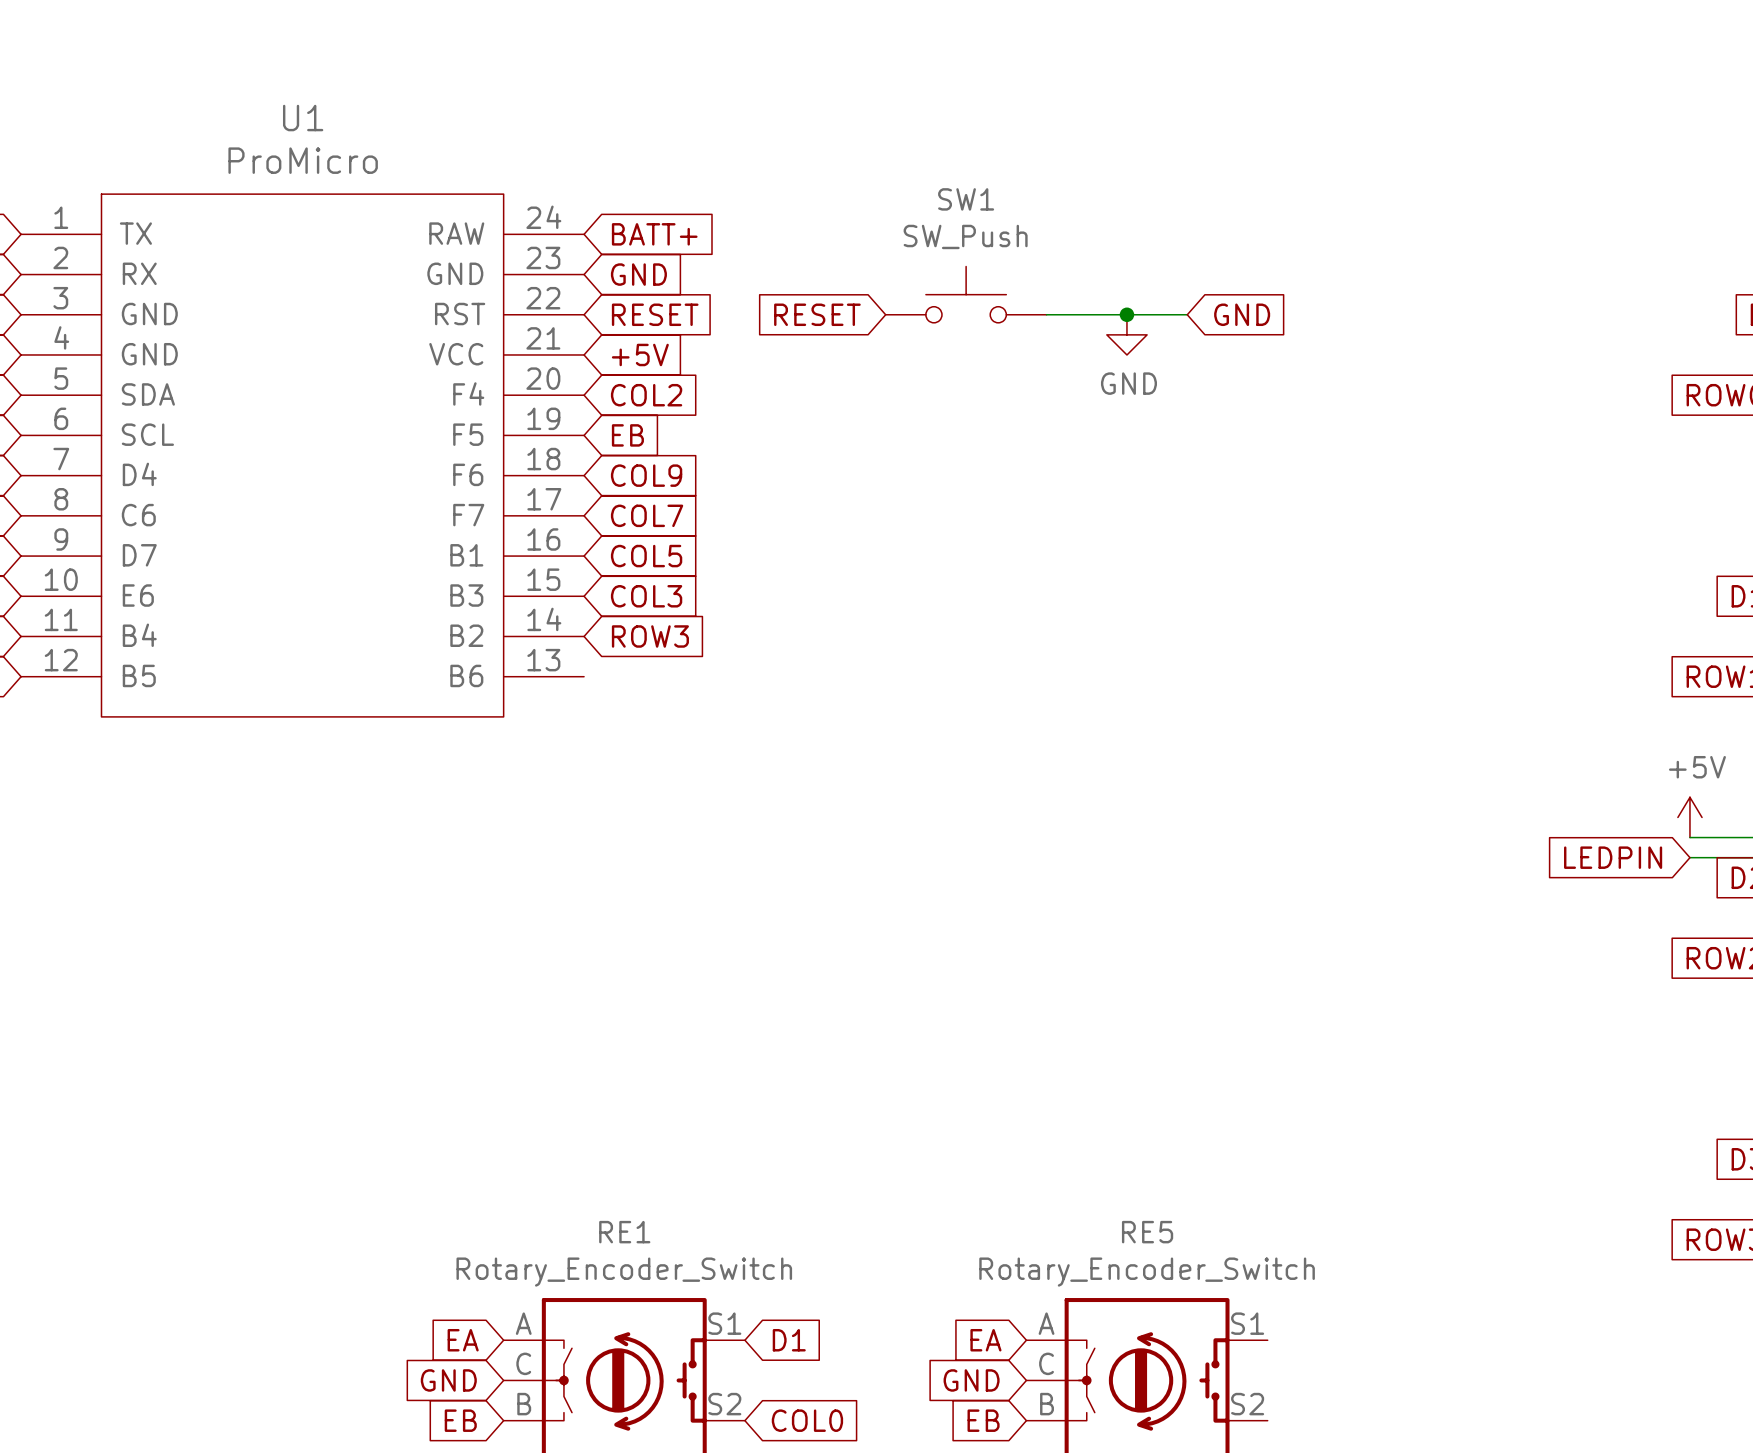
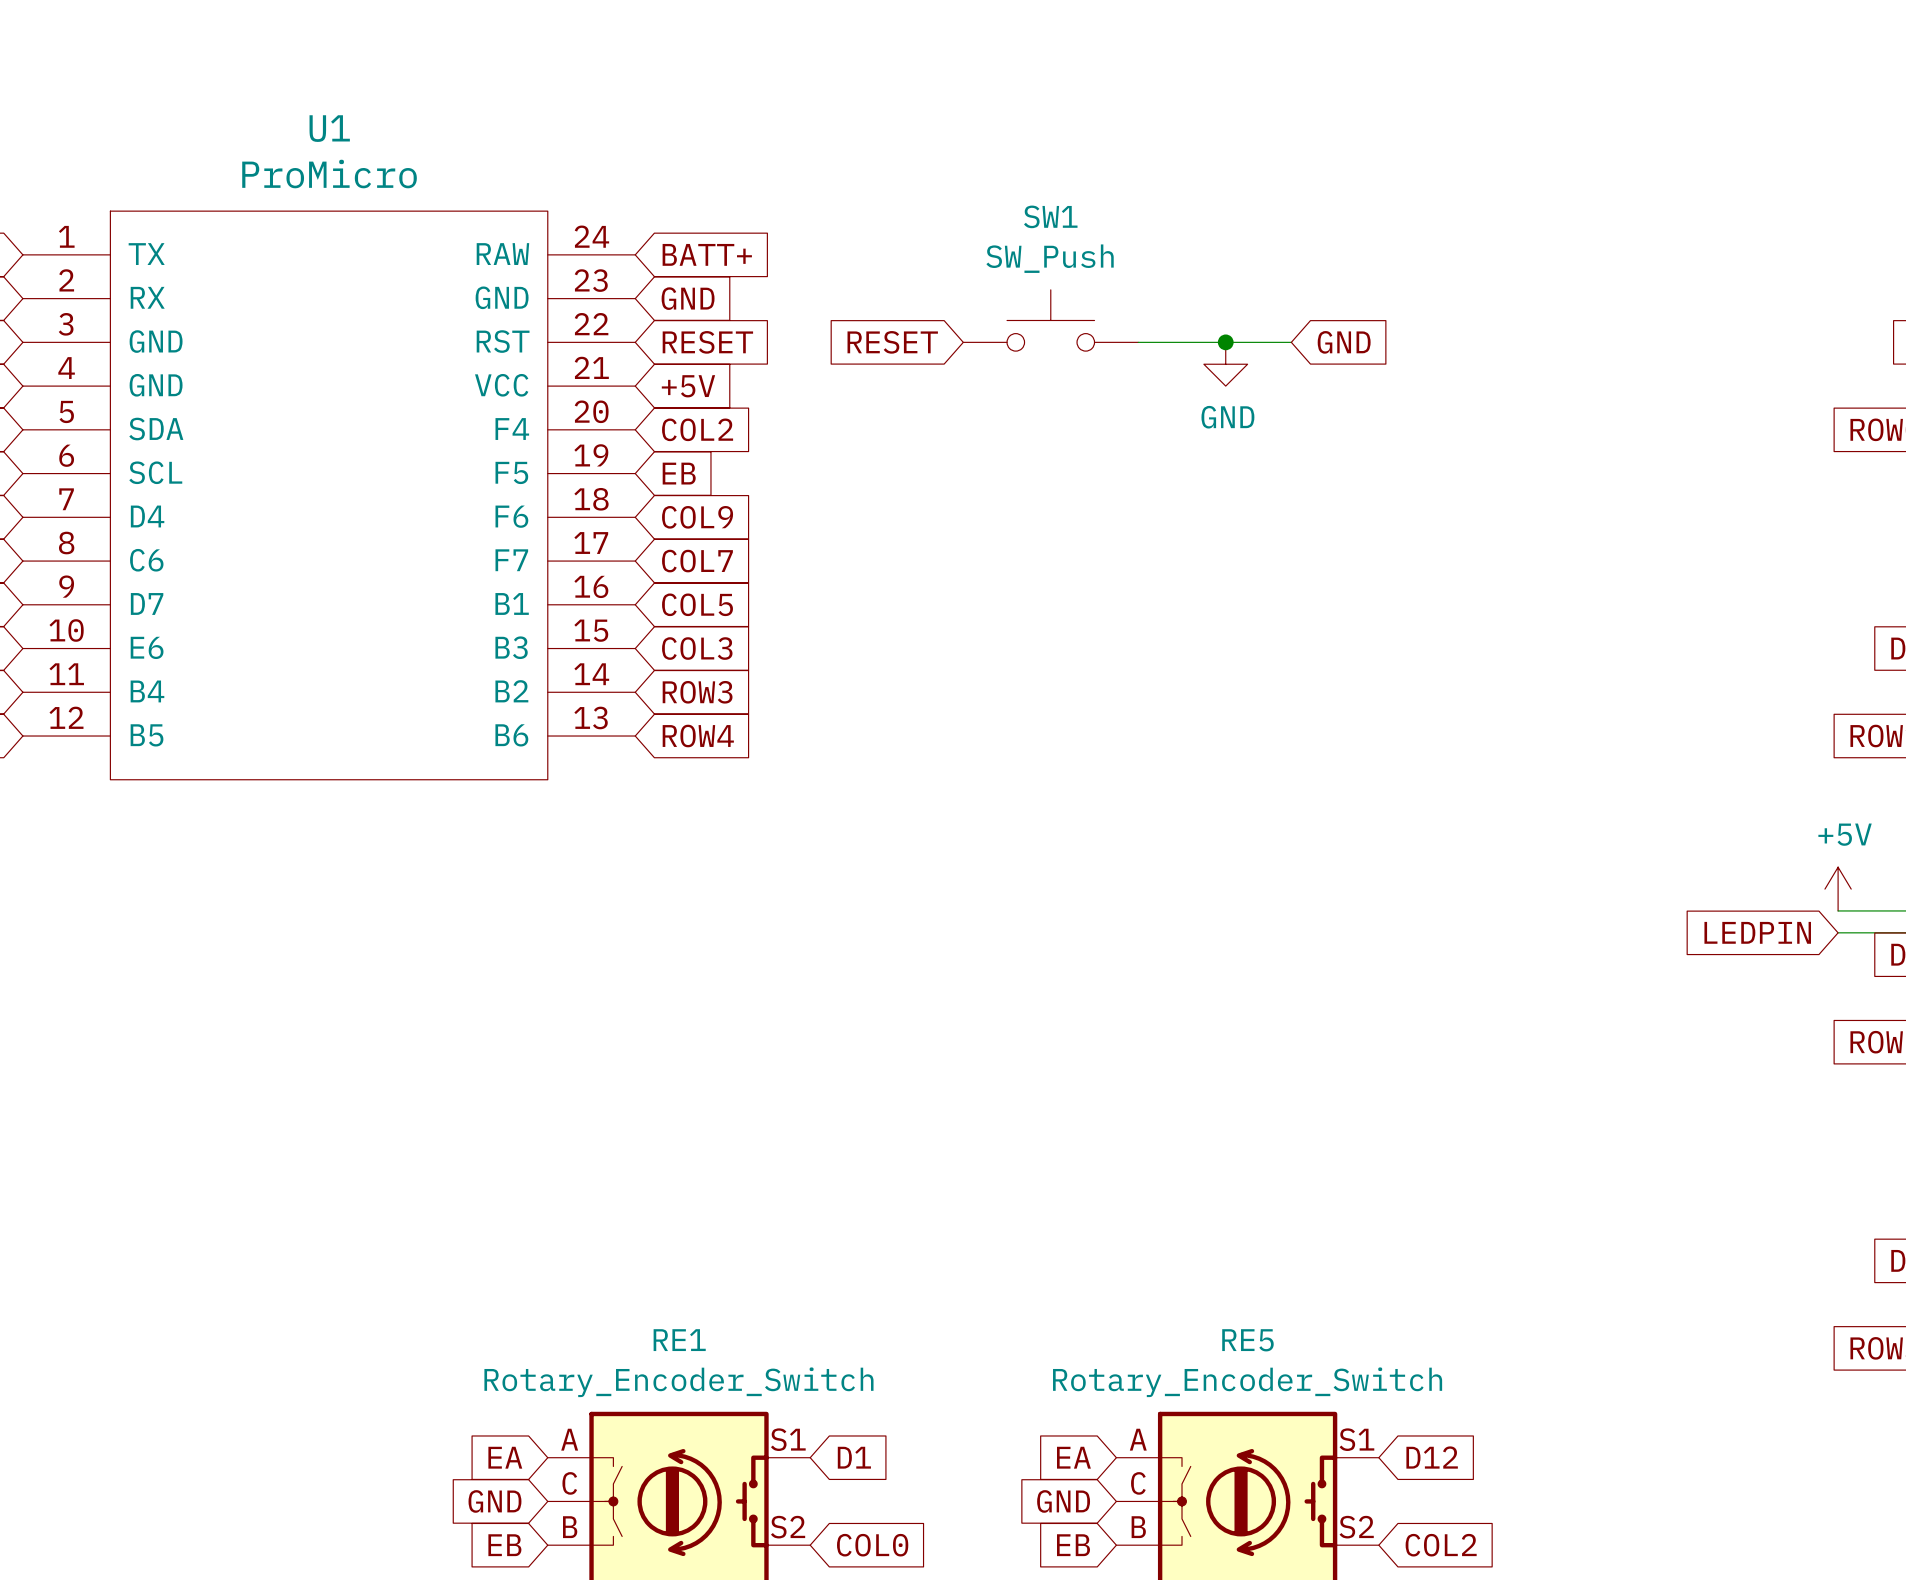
global label: none -> ROW4 (698, 736)
global label: none -> D12 (1432, 1457)
global label: none -> COL2 (1441, 1545)

